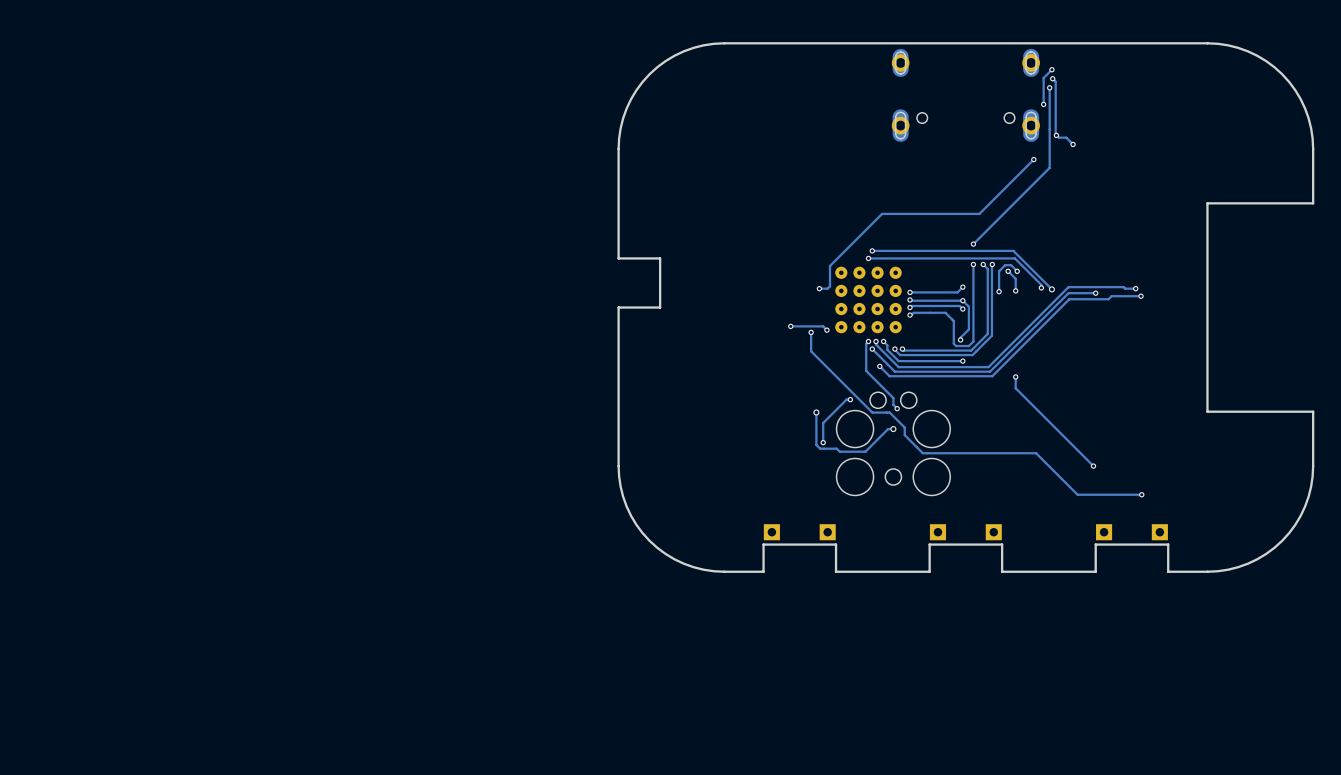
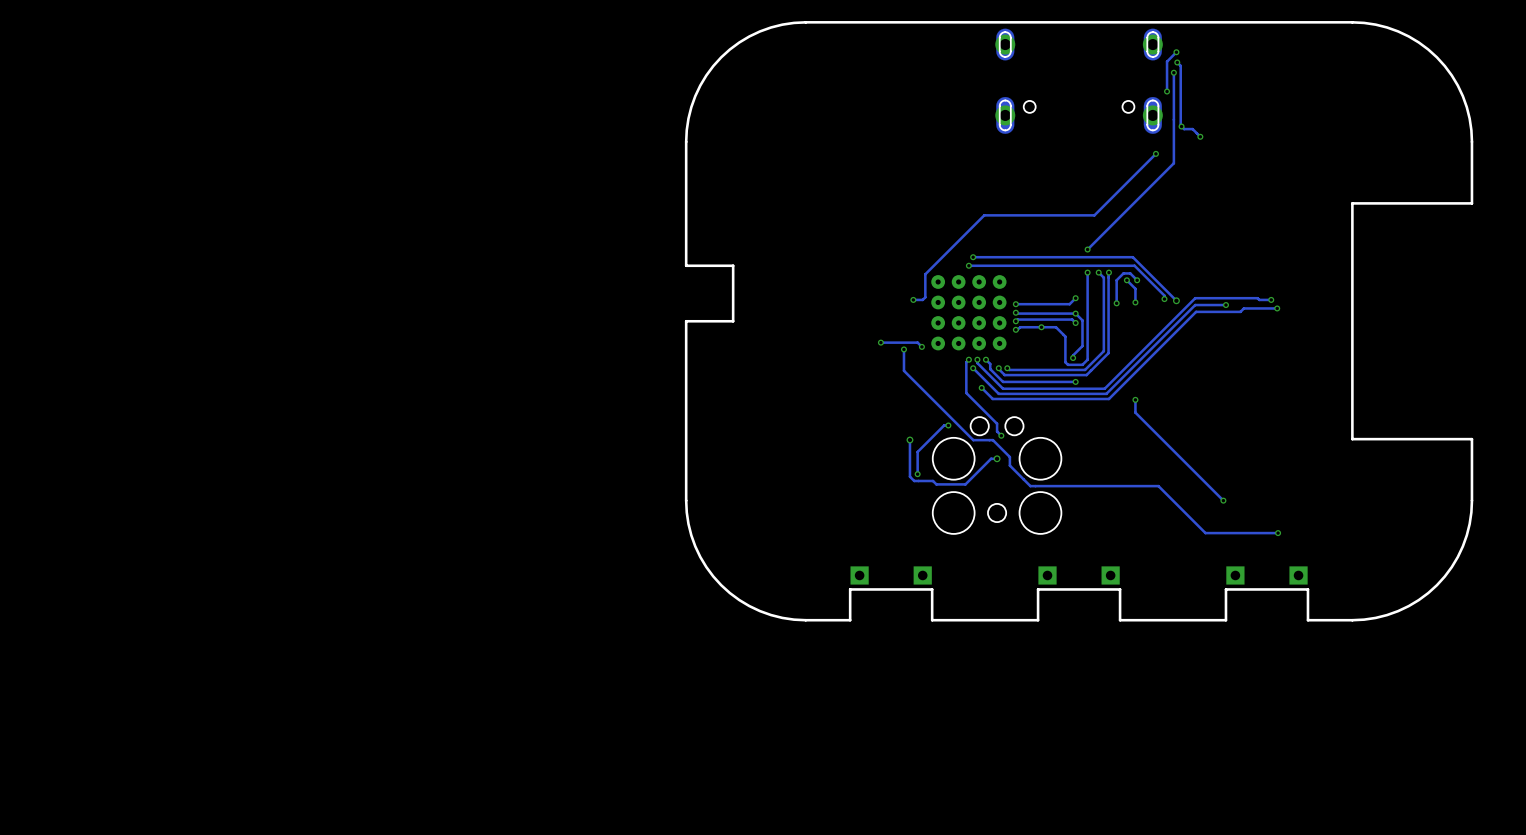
via: none -> (1041, 327)

